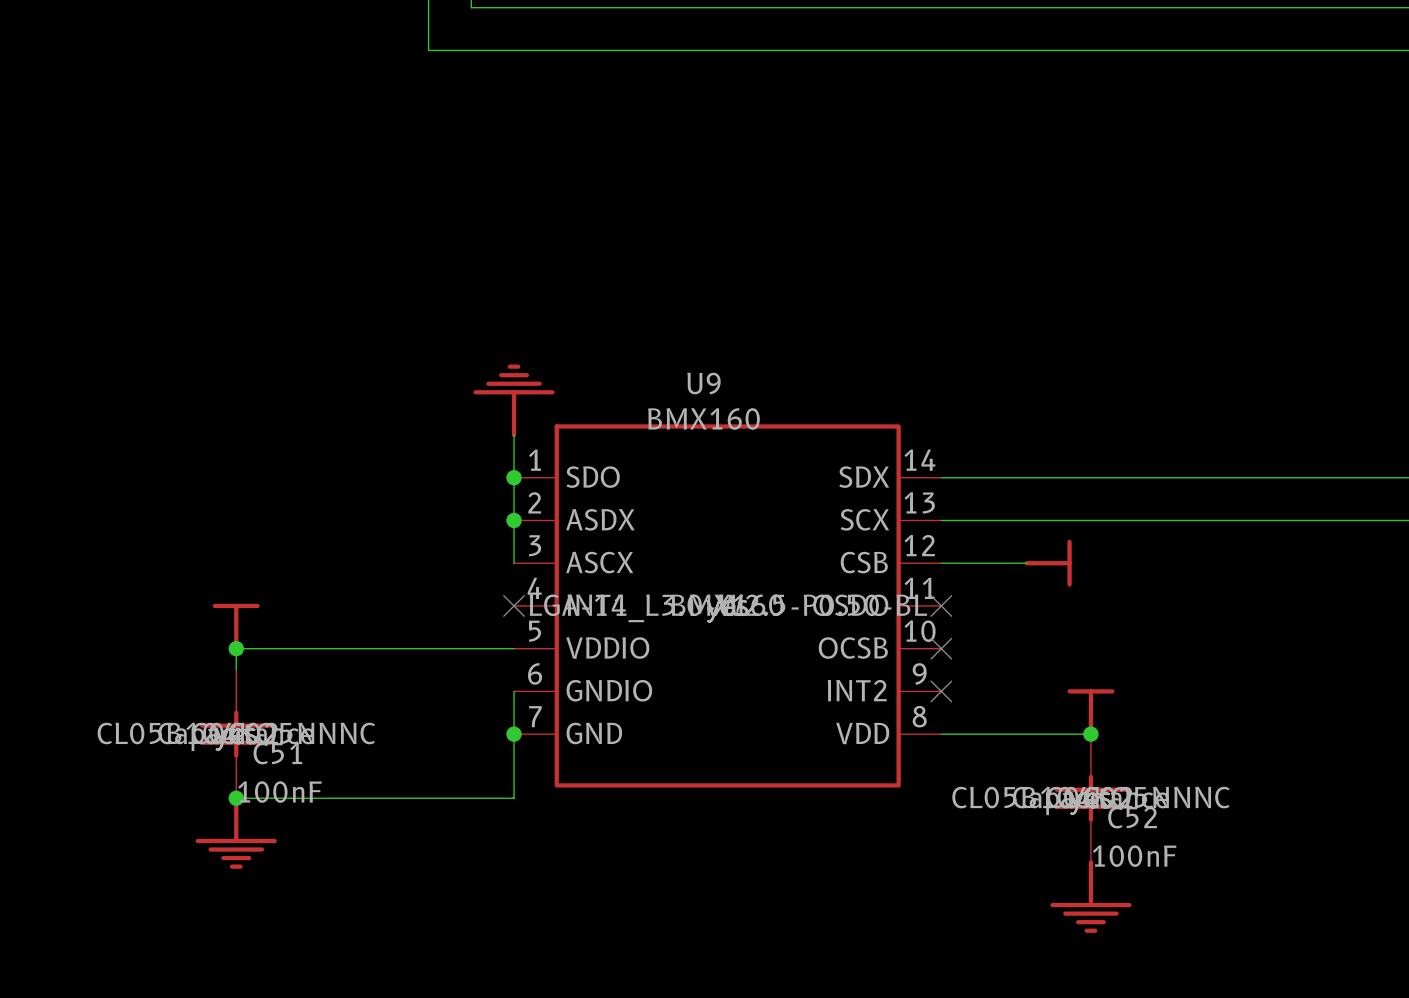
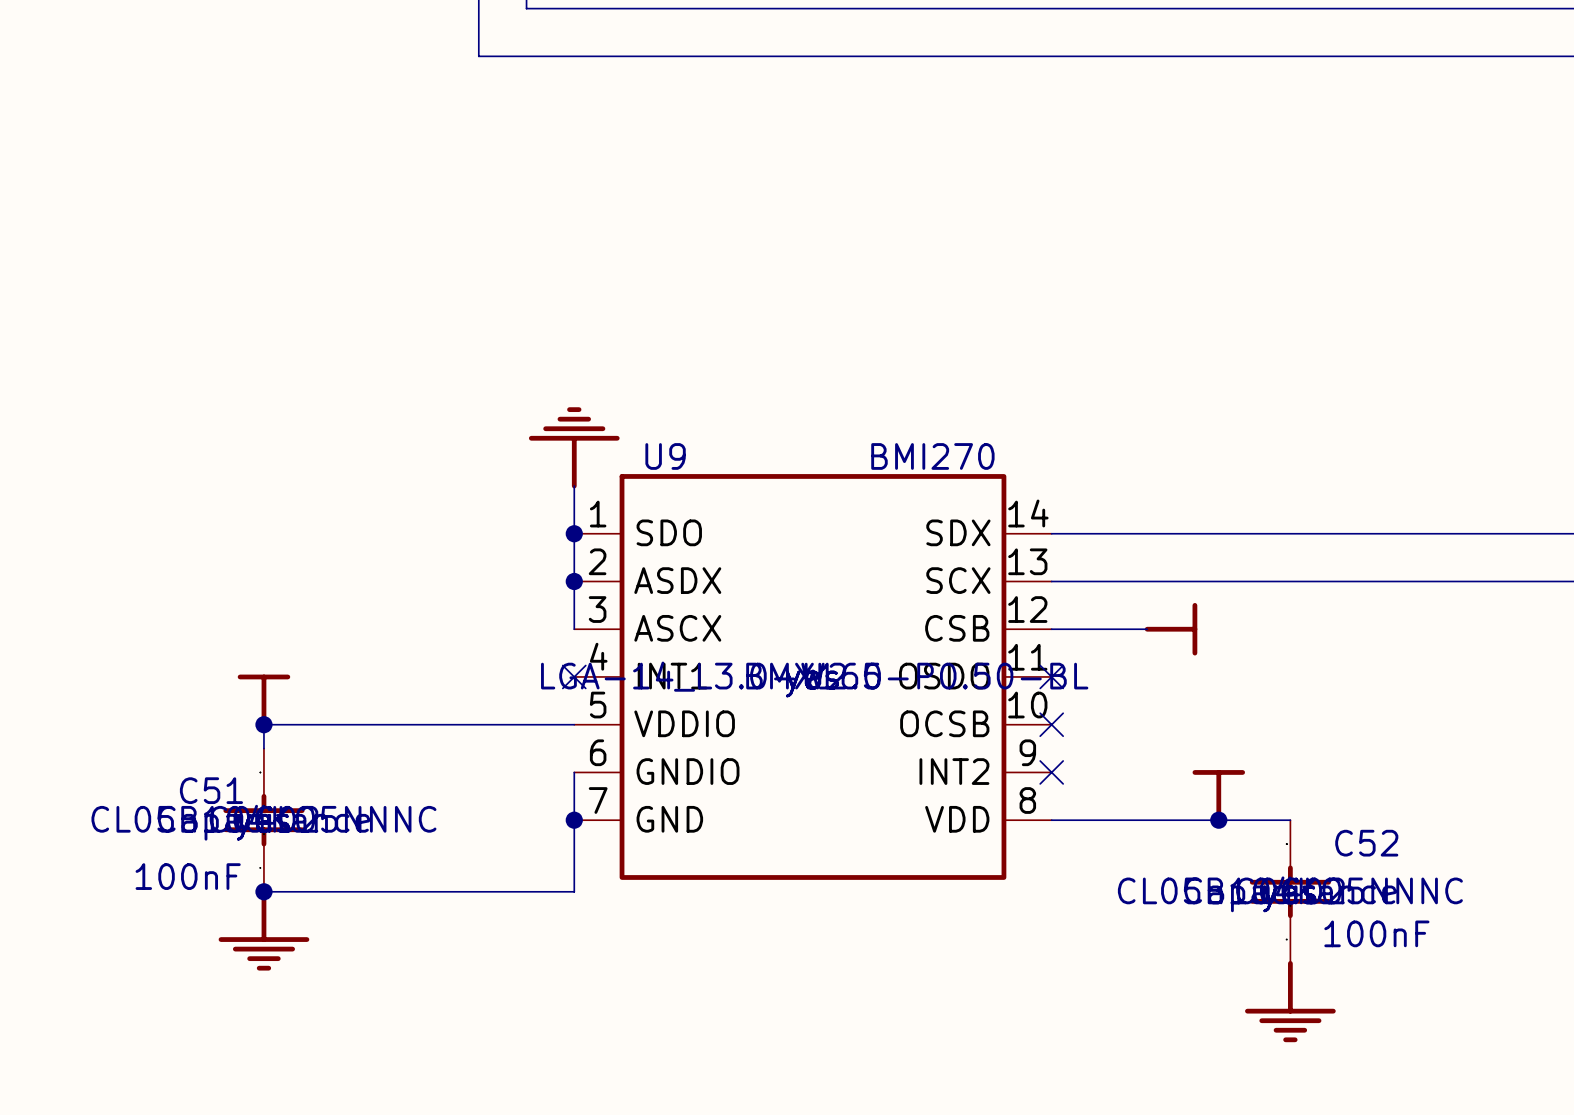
U9 name position: U9 (703, 383) -> U9 (665, 456)
U9 value: BMX160 (703, 418) -> BMI270 (932, 456)
wire: none -> (1218, 820) (1290, 820)
C51 name position: C51 (277, 753) -> C51 (211, 790)
C51 value position: 100nF (280, 792) -> 100nF (188, 876)
C52 position: (1090, 798) -> (1290, 891)
C52 name position: C52 (1132, 817) -> C52 (1366, 843)
C52 value position: 100nF (1134, 856) -> 100nF (1376, 933)
power symbol position: (1090, 896) -> (1290, 1001)

